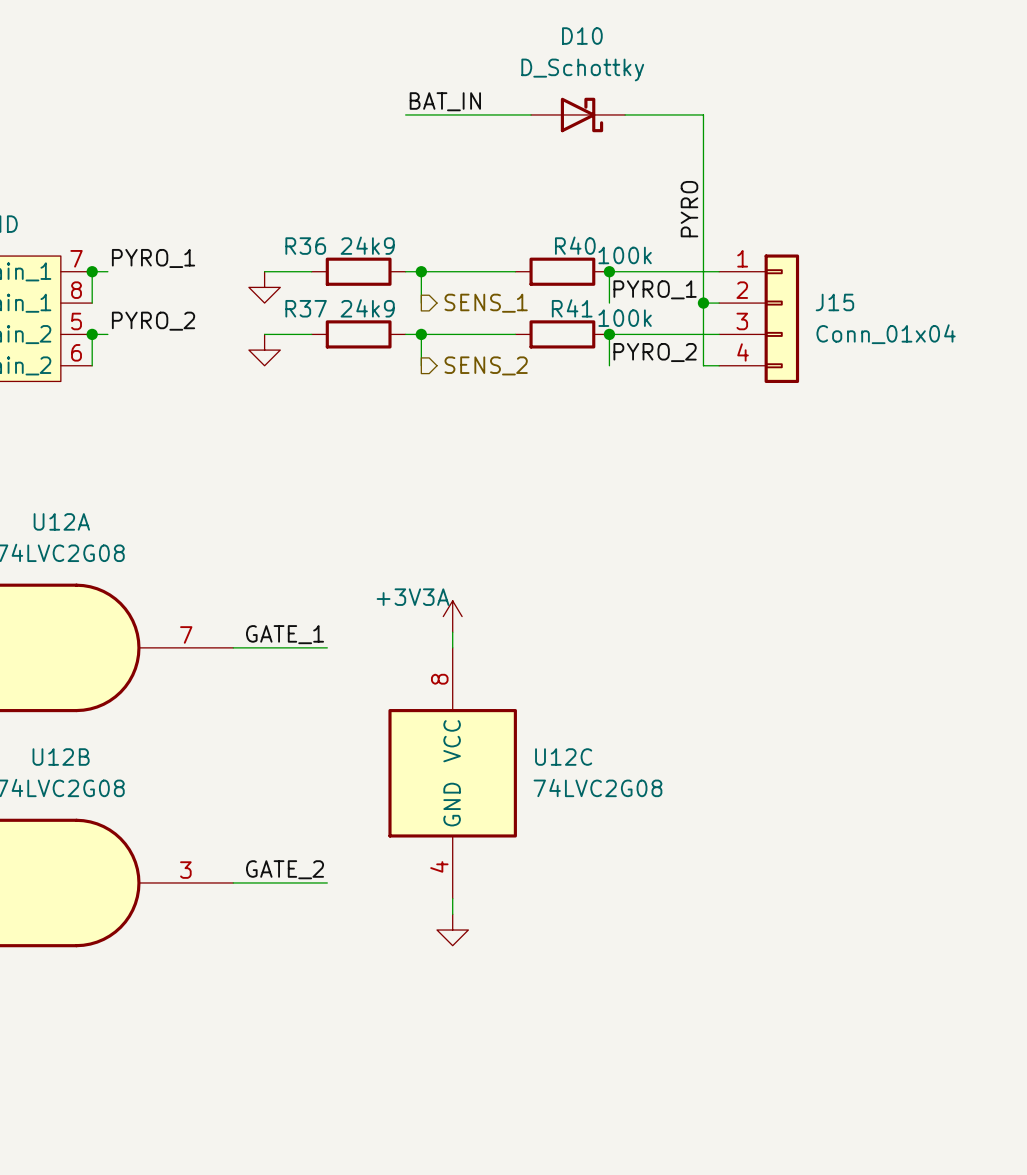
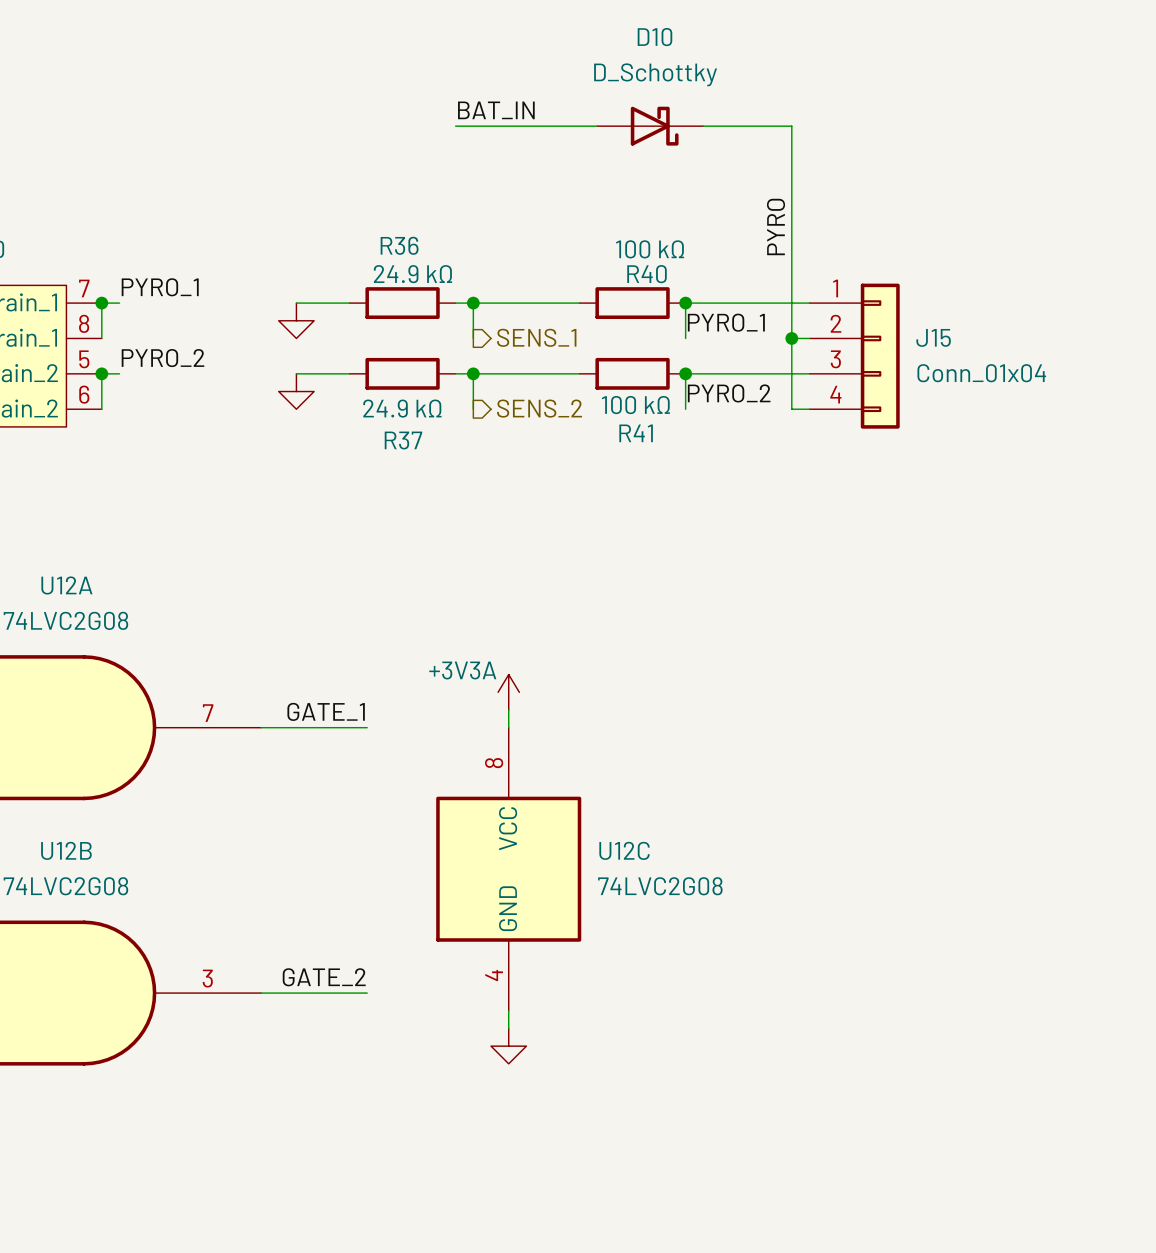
R36 value: 24k9 (367, 245) -> 24.9 kΩ (413, 274)
R36 name position: R36 (305, 246) -> R36 (399, 245)
R40 value: 100k (625, 255) -> 100 kΩ (650, 249)
R37 name position: R37 (306, 308) -> R37 (403, 440)
R37 value: 24k9 (367, 308) -> 24.9 kΩ (402, 408)
R41 name position: R41 (572, 308) -> R41 (636, 433)
R41 value: 100k (625, 318) -> 100 kΩ (635, 405)

